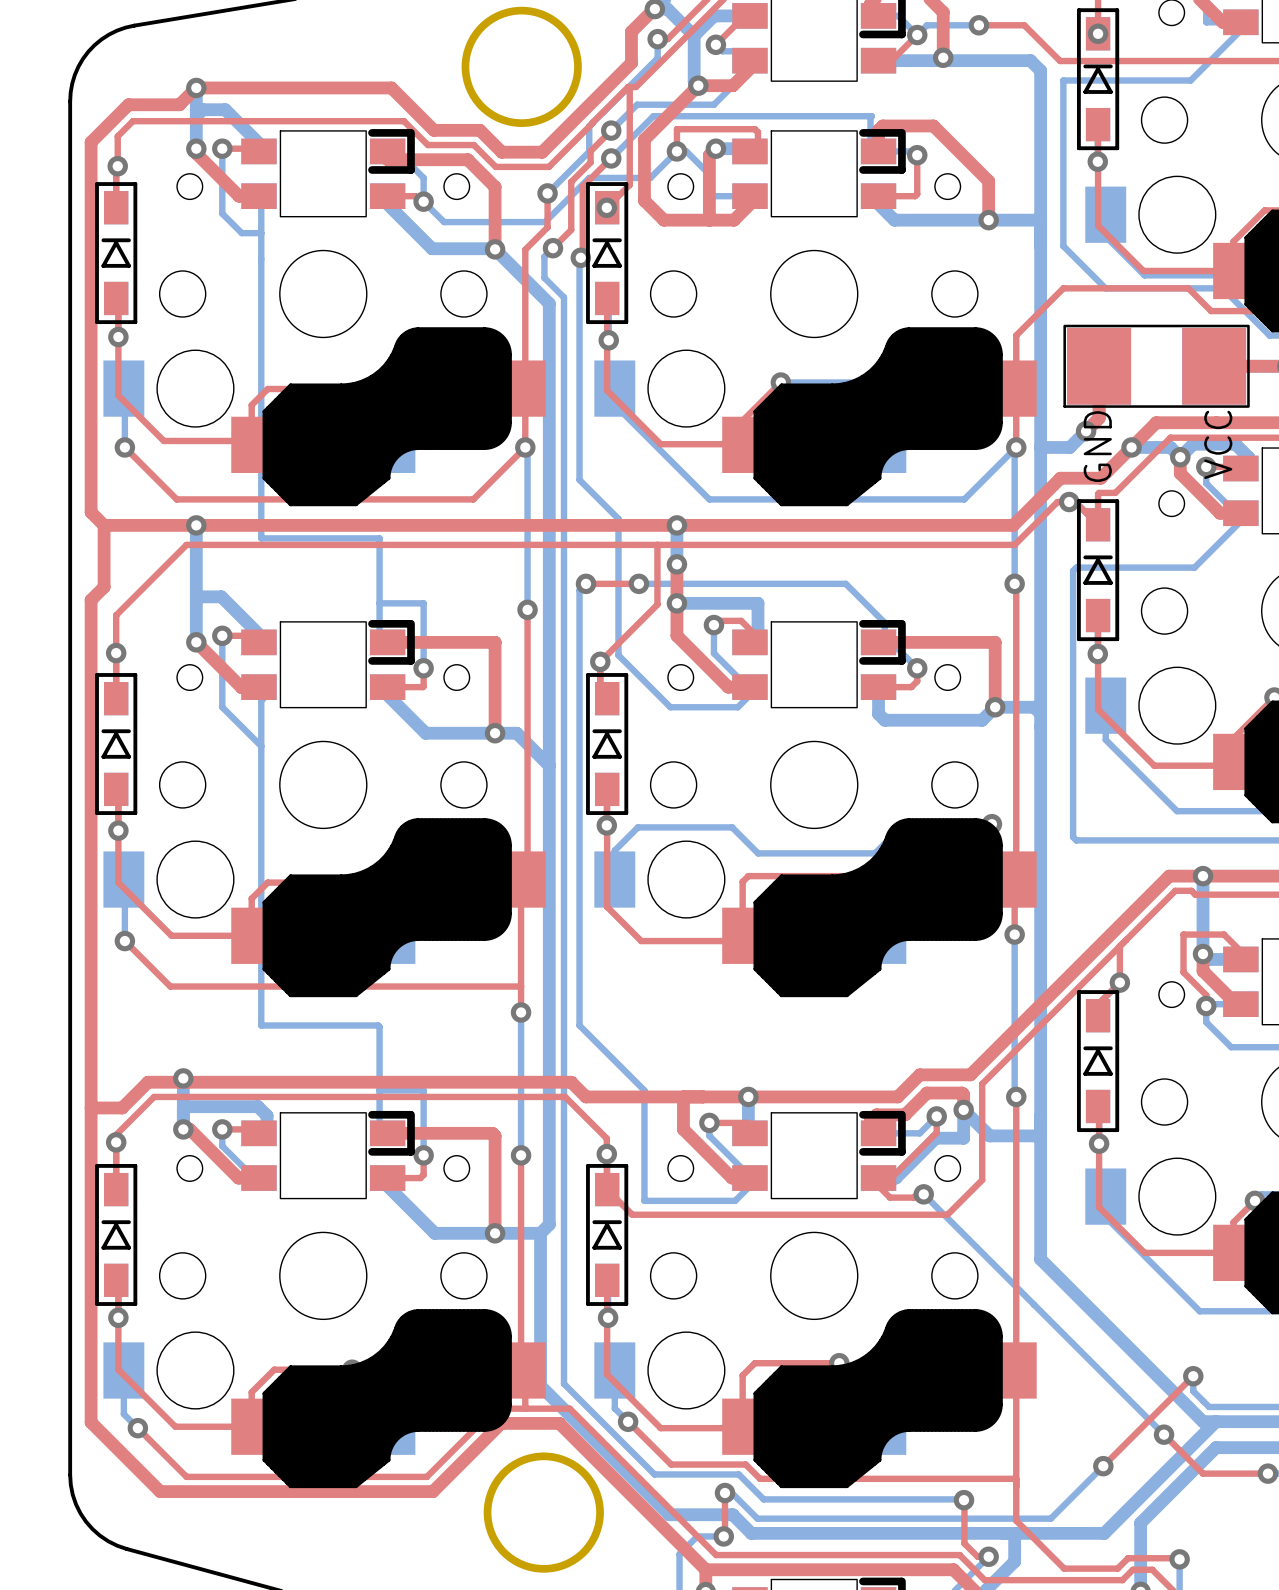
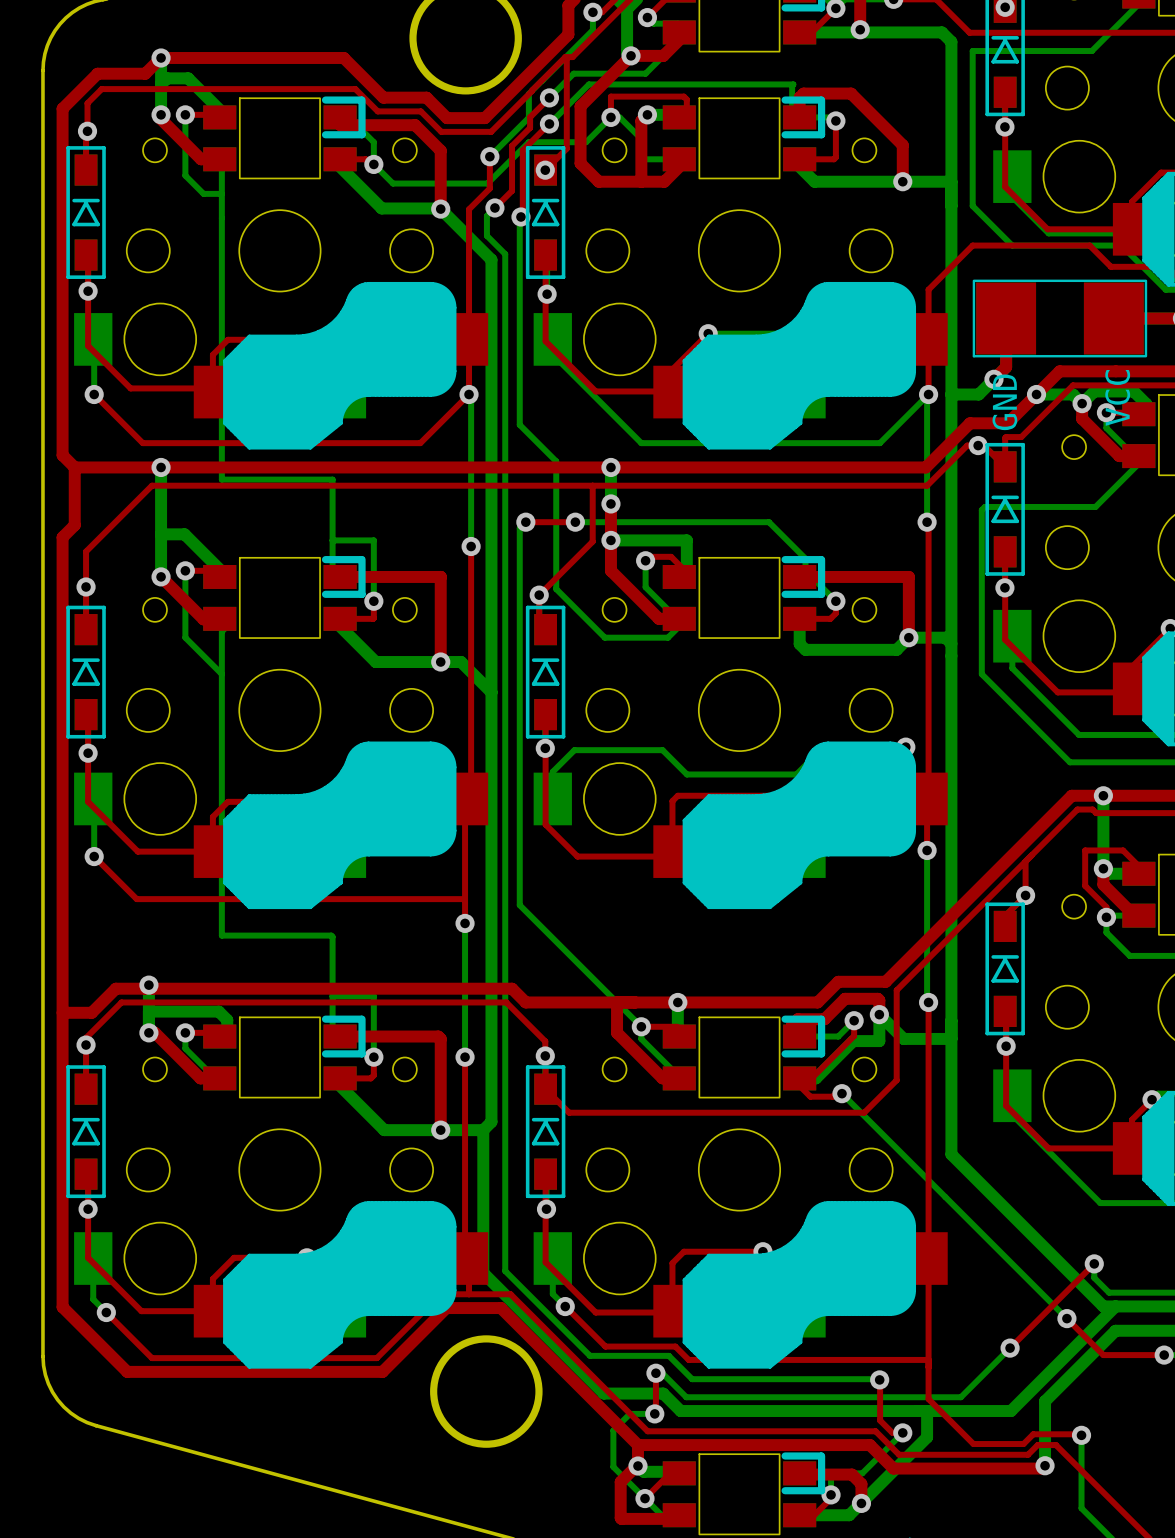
bottom track: (1073, 746) (1073, 837) (1076, 840) (1167, 840) -> (981, 674) (1069, 762)
bottom track: (579, 993) (579, 1025) (644, 1090) (644, 1200) (735, 1200) (757, 1178) -> (519, 905) (641, 1026)

